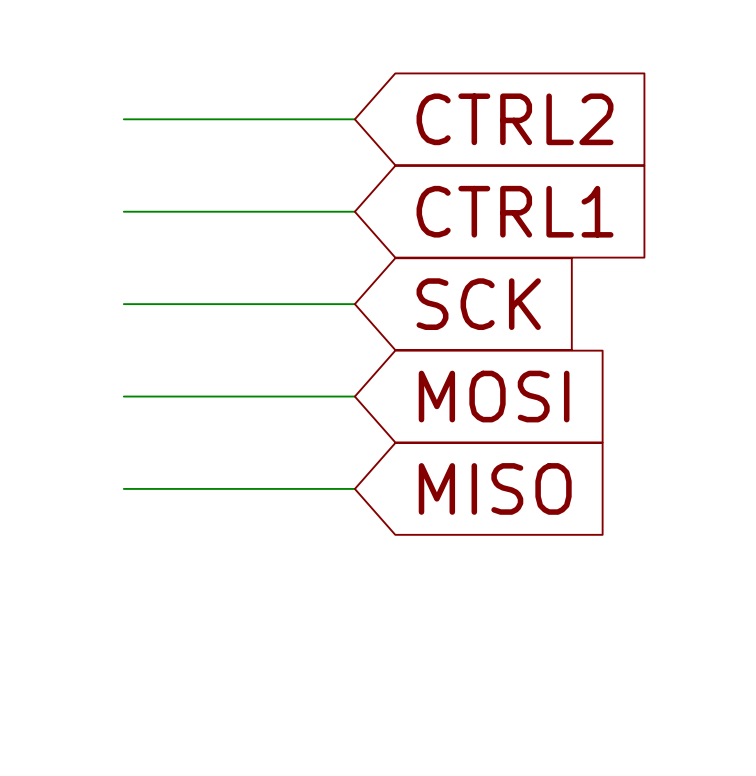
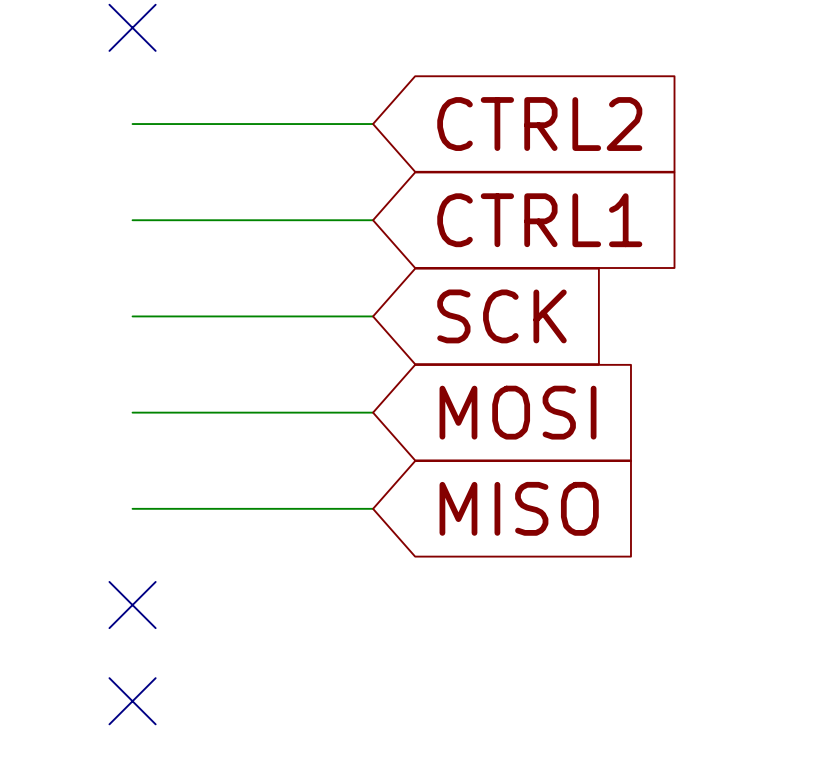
no-connect mark: none -> (132, 27)
no-connect mark: none -> (132, 605)
no-connect mark: none -> (132, 701)

